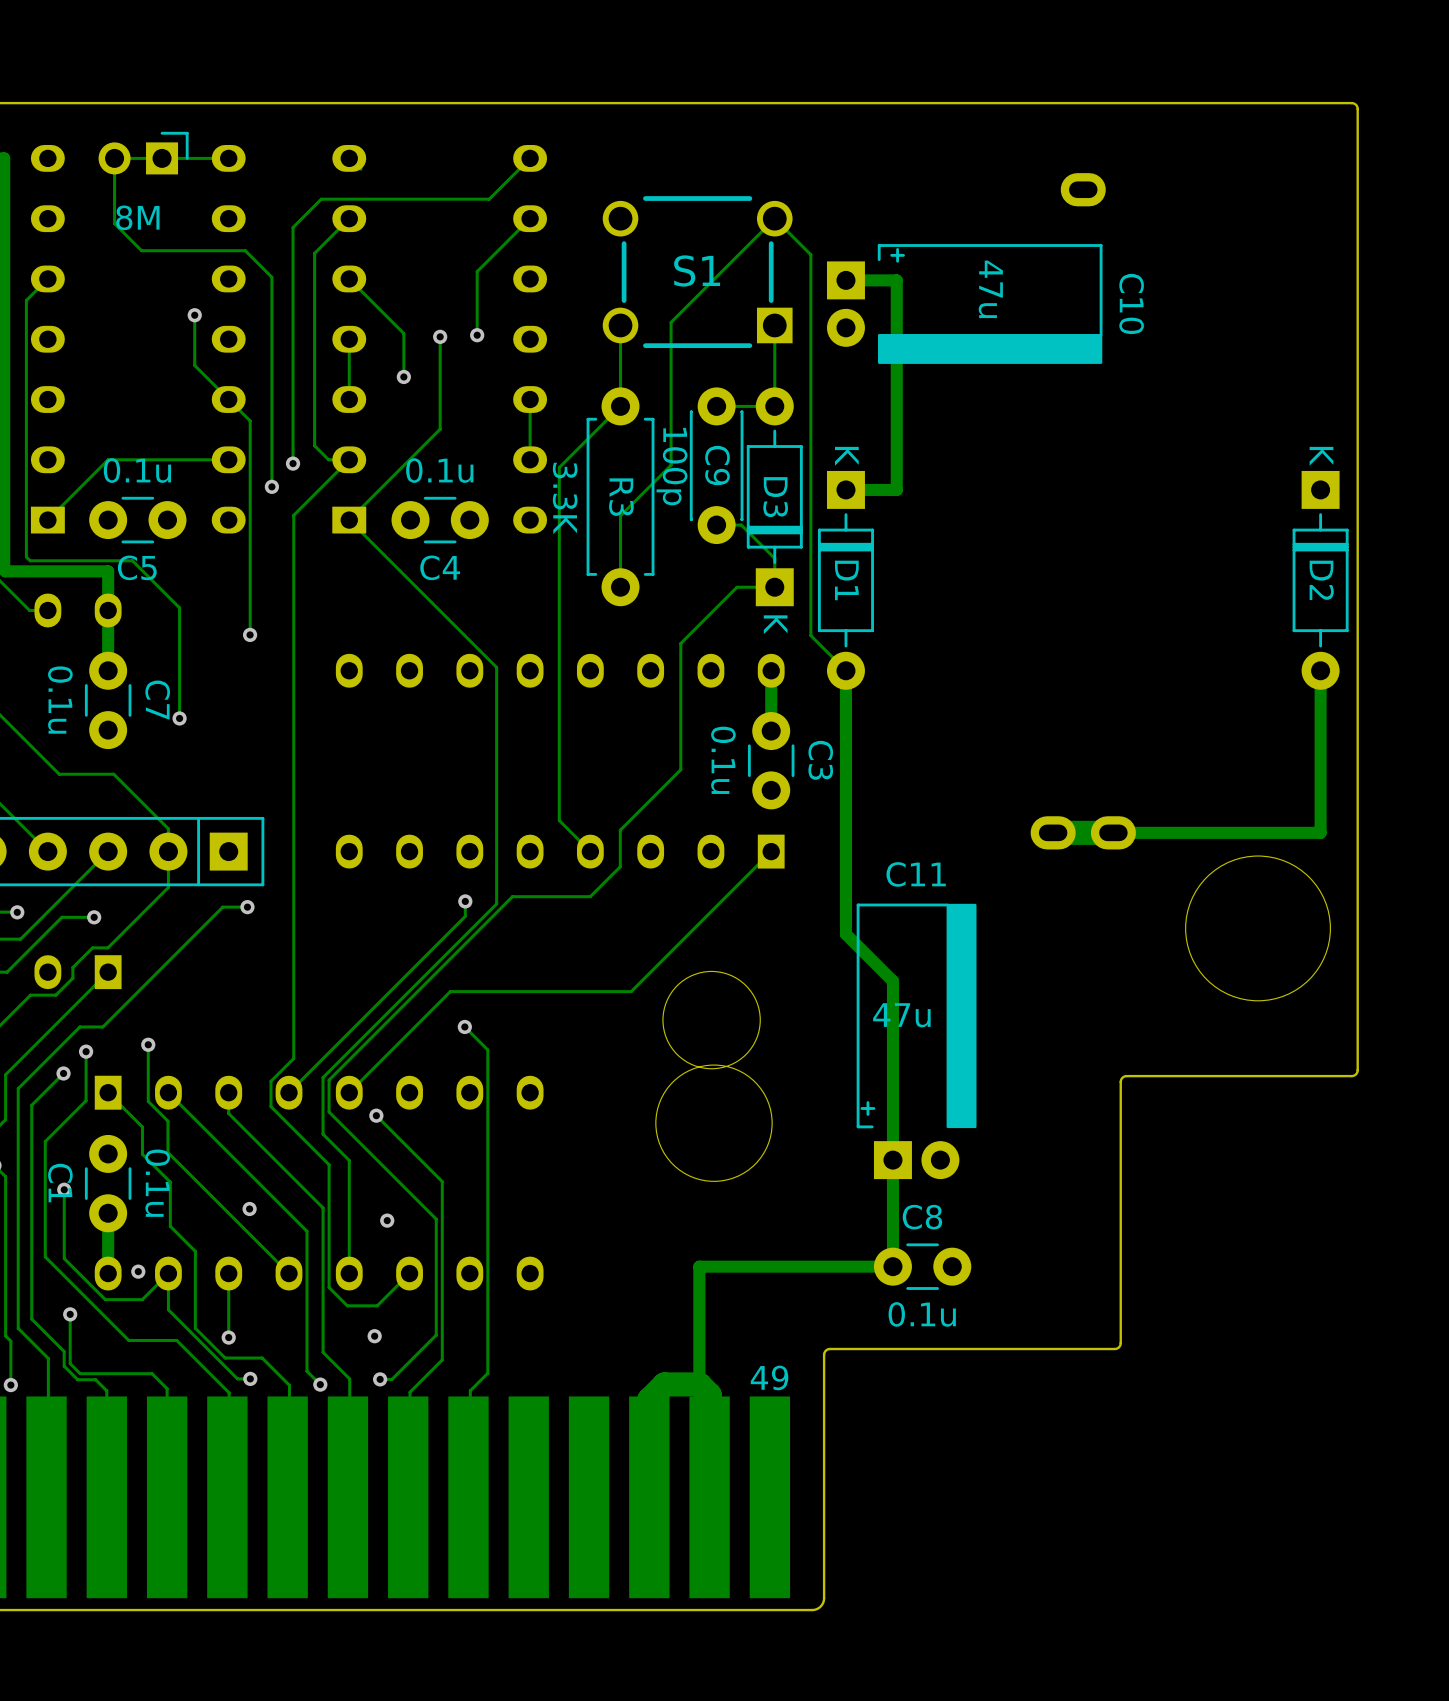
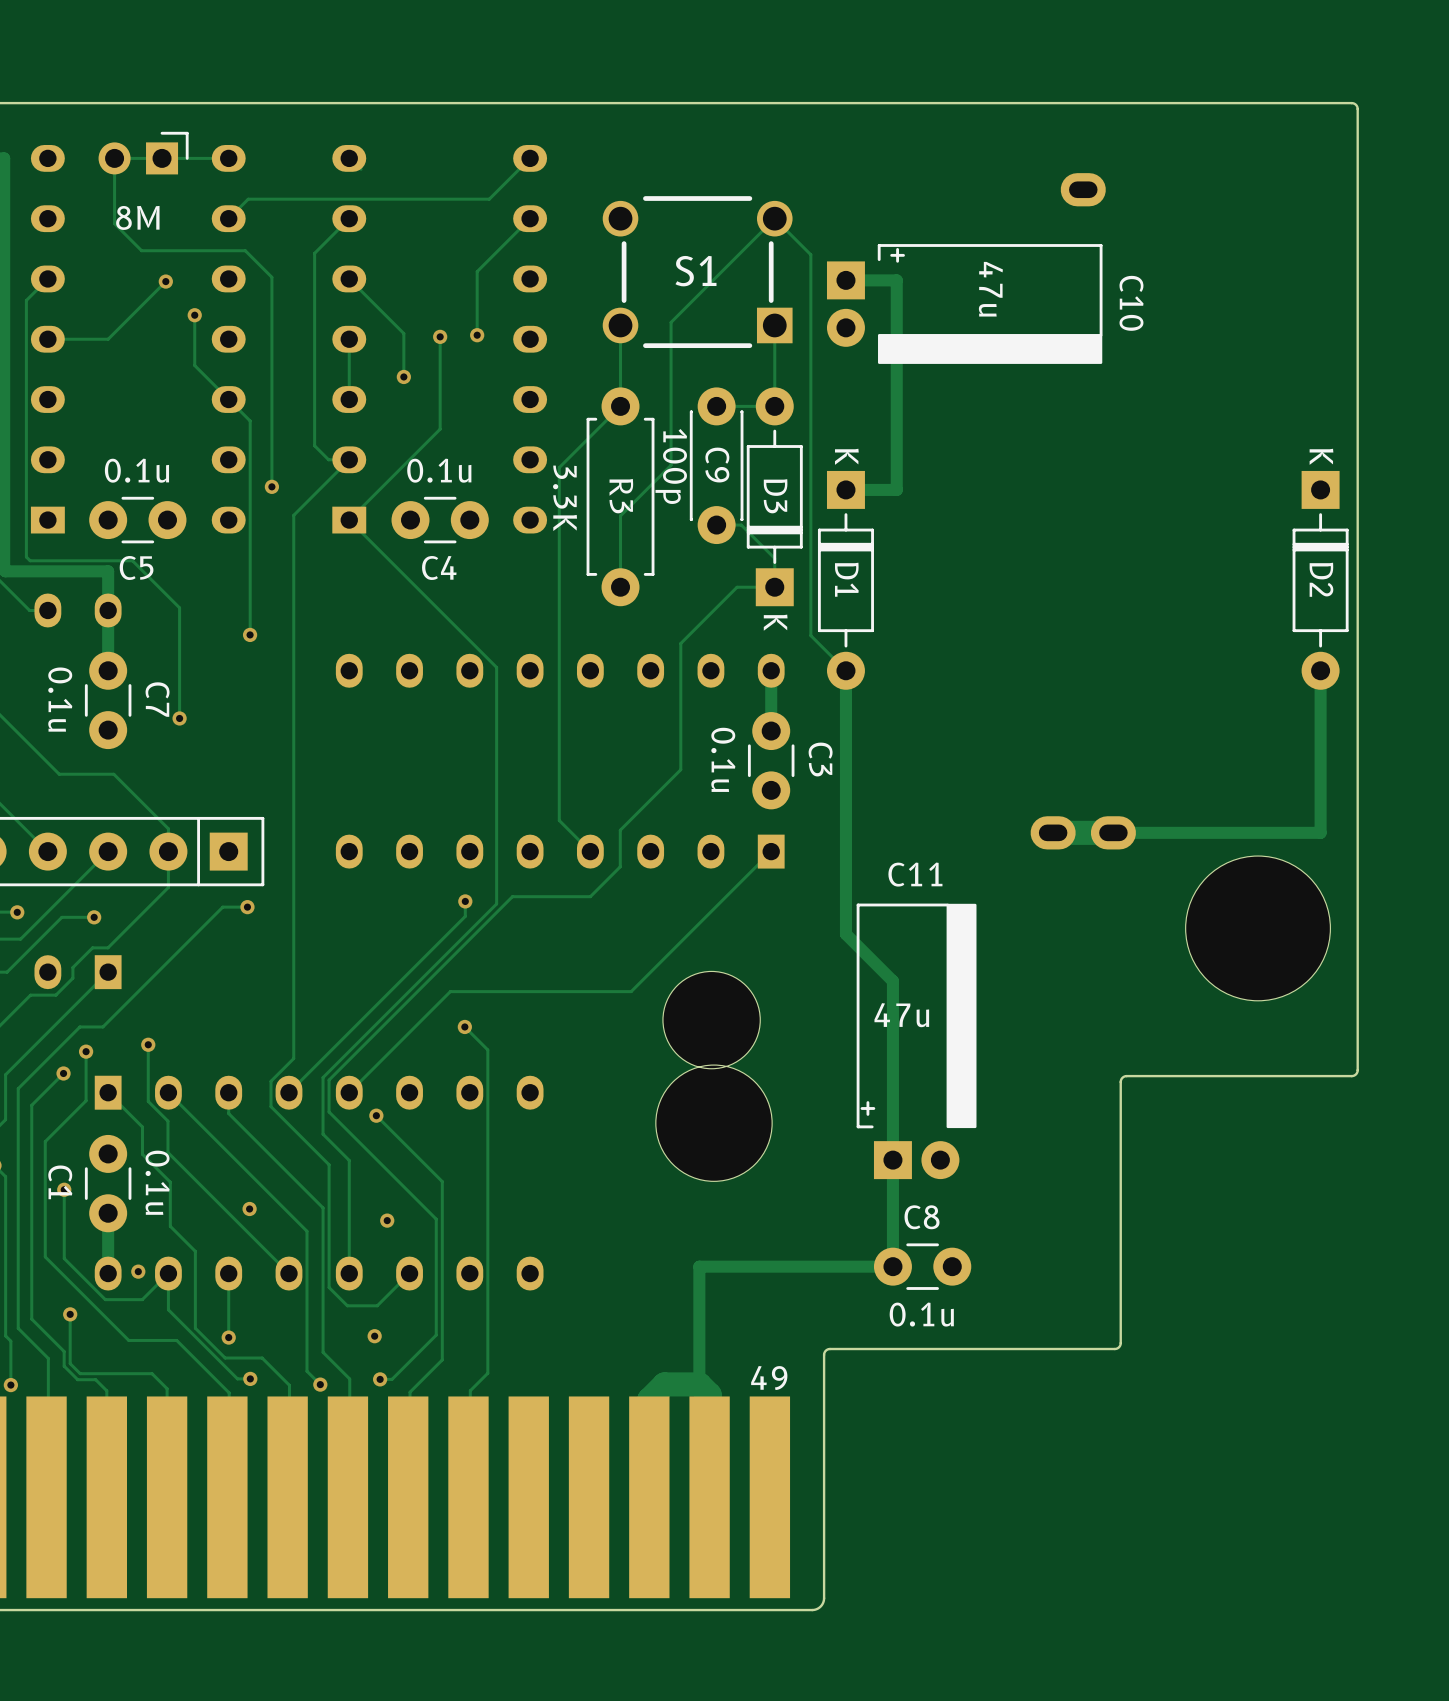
track: (321, 199) (293, 227) (293, 463) -> (321, 199) (248, 199) (228, 218)
track: none -> (165, 281) (108, 339) (47, 339)
via: none -> (165, 281)
track: (530, 399) (530, 459) -> none
track: (228, 459) (108, 459) (47, 520) -> none
via: (293, 463) -> none

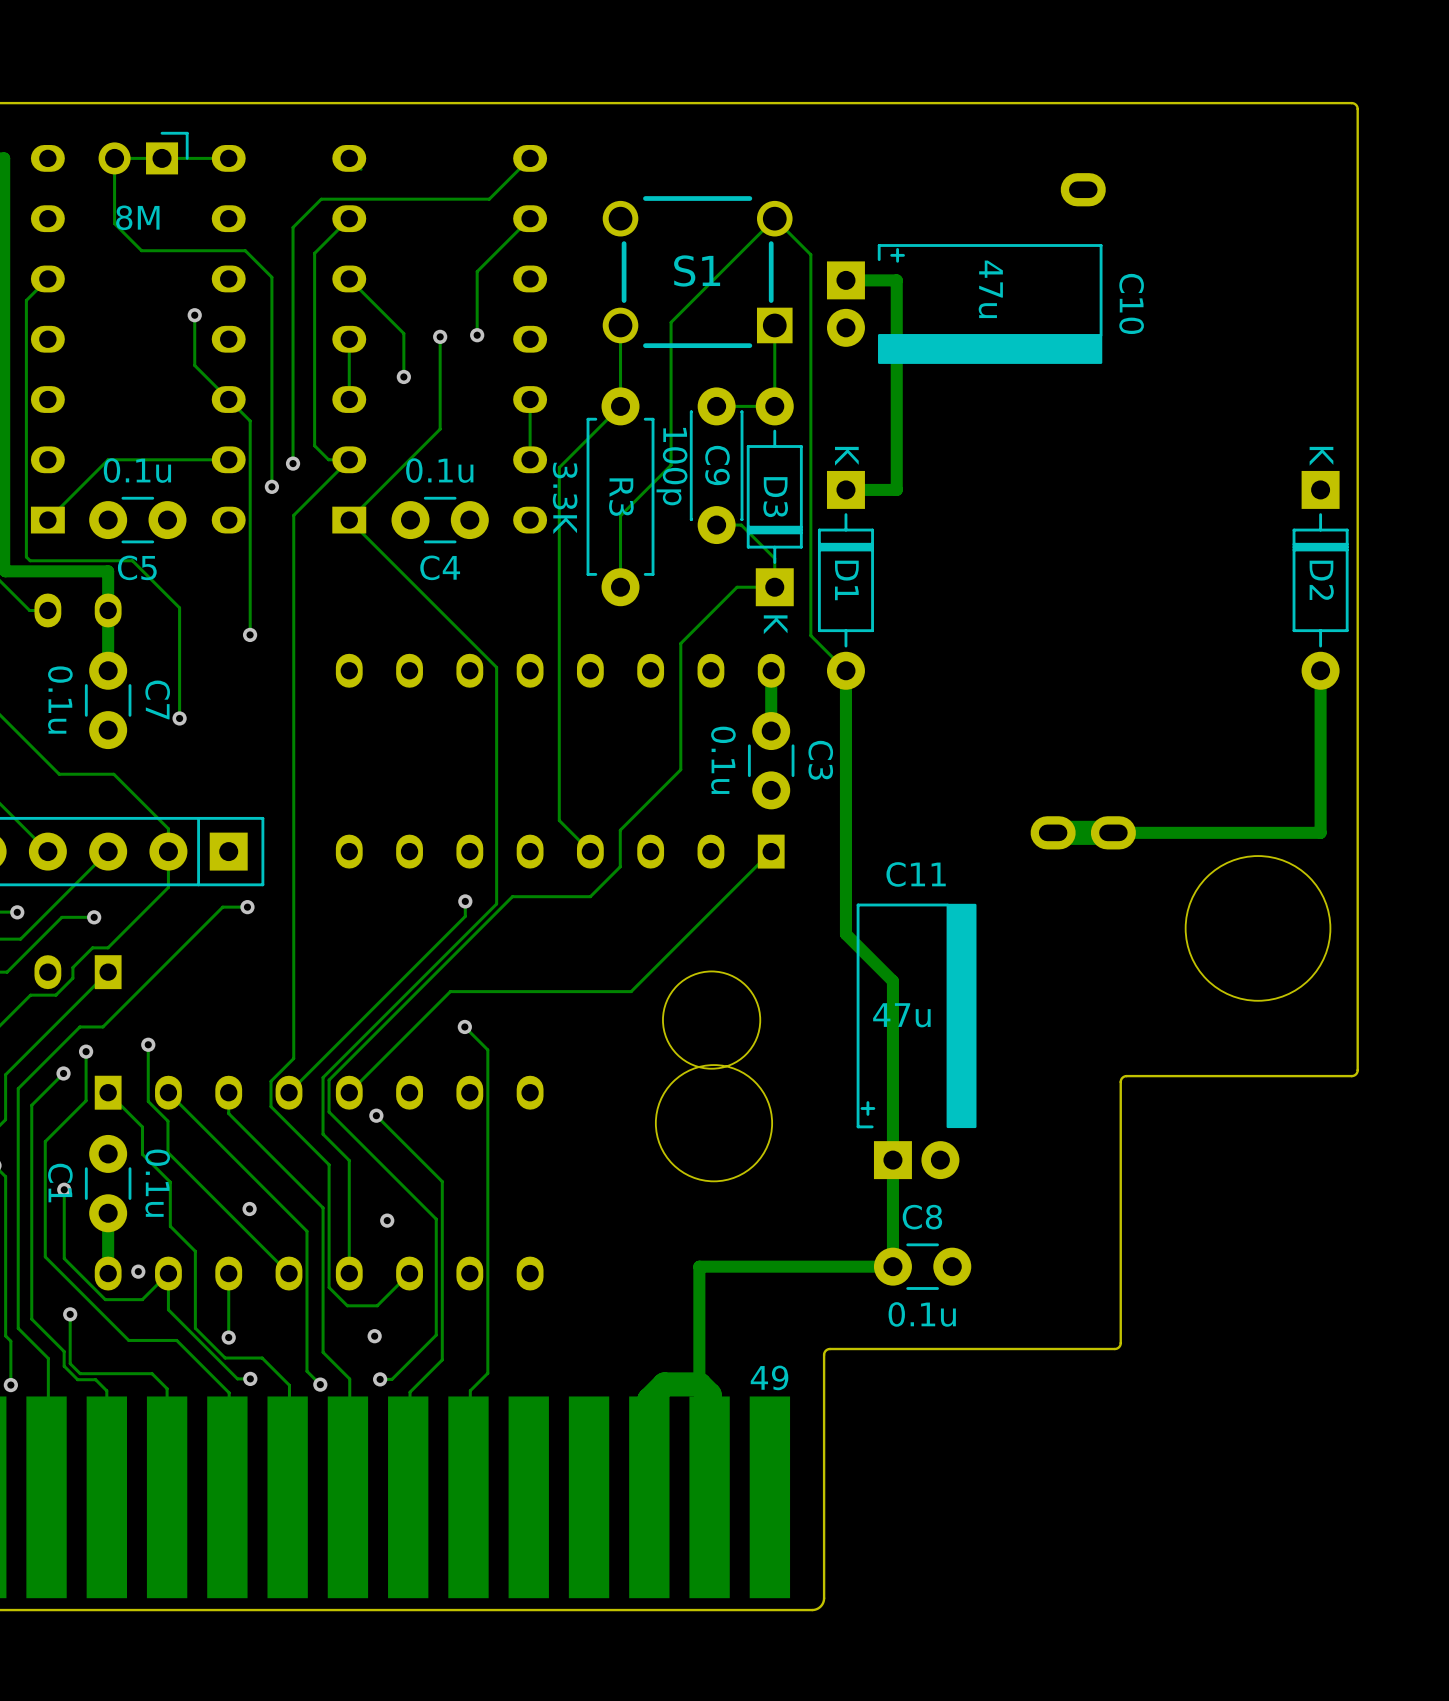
track: (321, 199) (248, 199) (228, 218) -> (321, 199) (293, 227) (293, 463)
track: (165, 281) (108, 339) (47, 339) -> none
via: (165, 281) -> none
track: none -> (530, 399) (530, 459)
track: none -> (228, 459) (108, 459) (47, 520)
via: none -> (293, 463)

